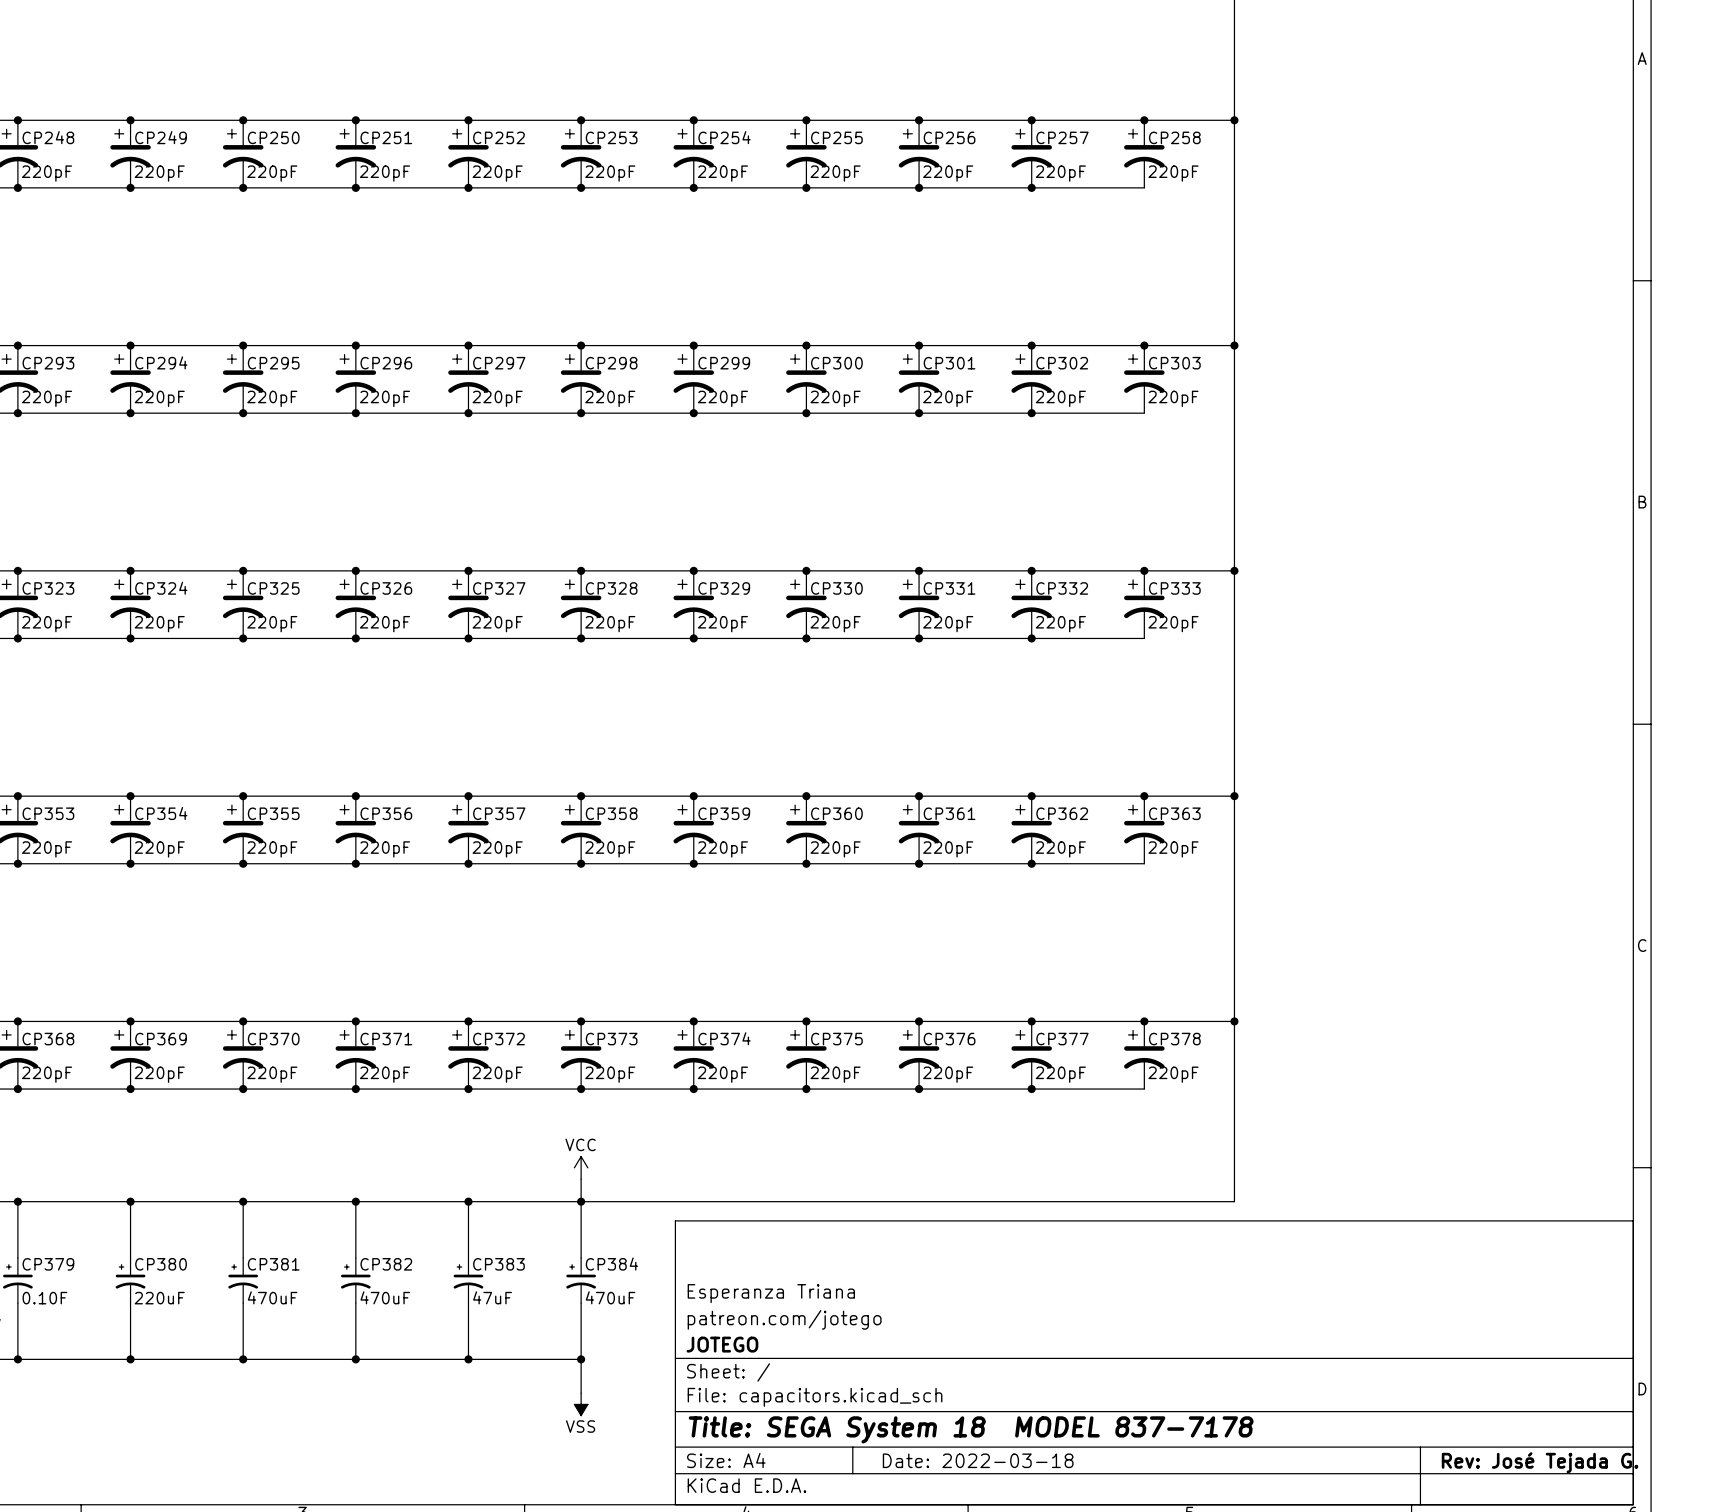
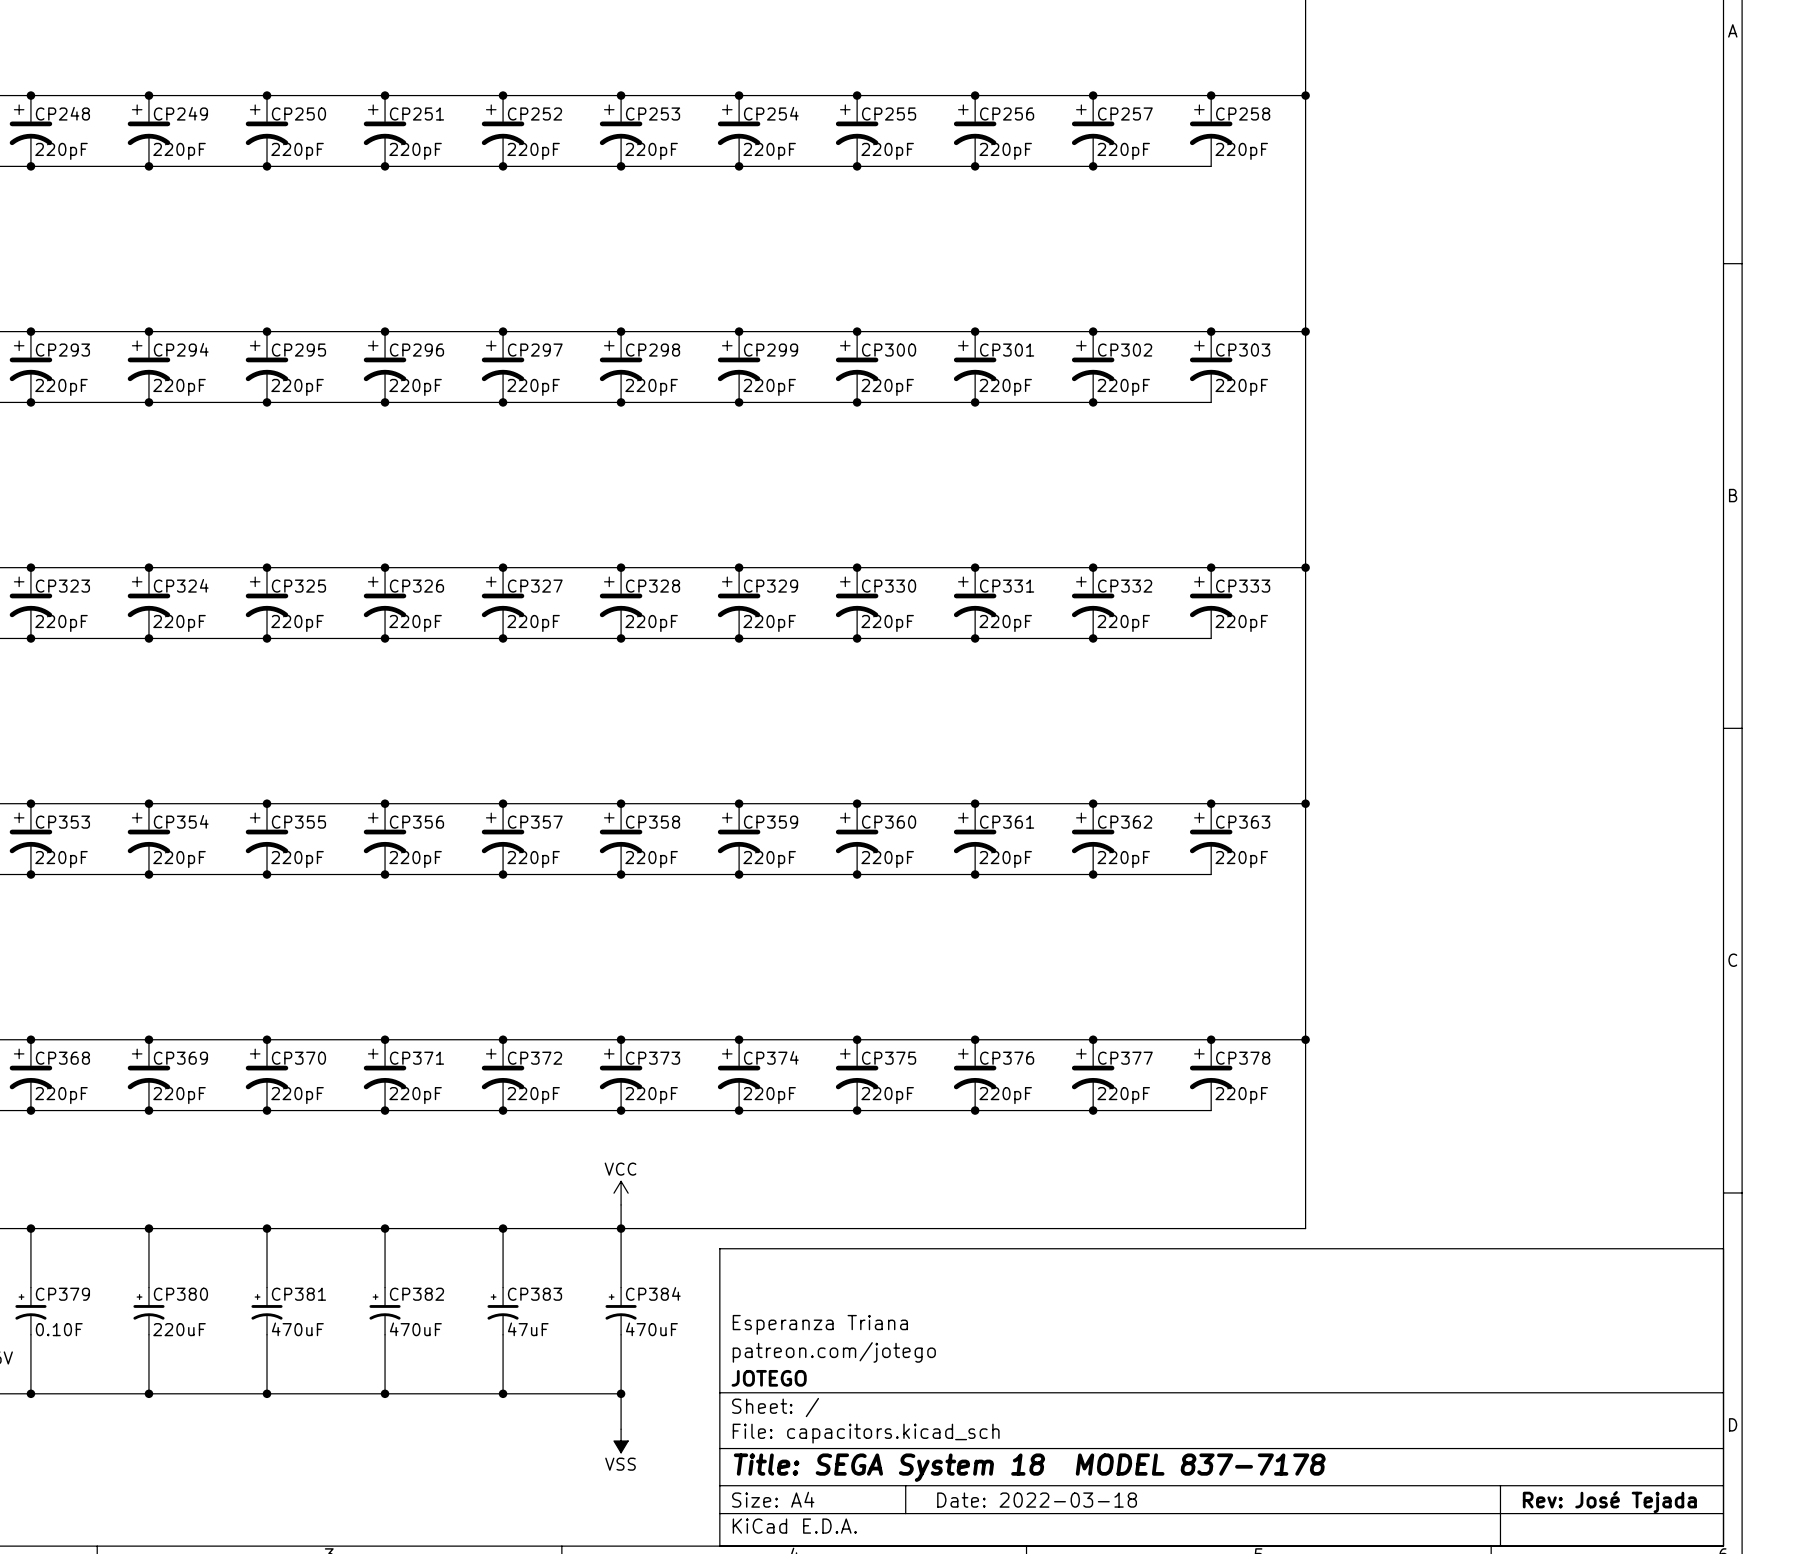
title block: Rev: José Tejada G. (1540, 1462) -> Rev: José Tejada (1609, 1502)

